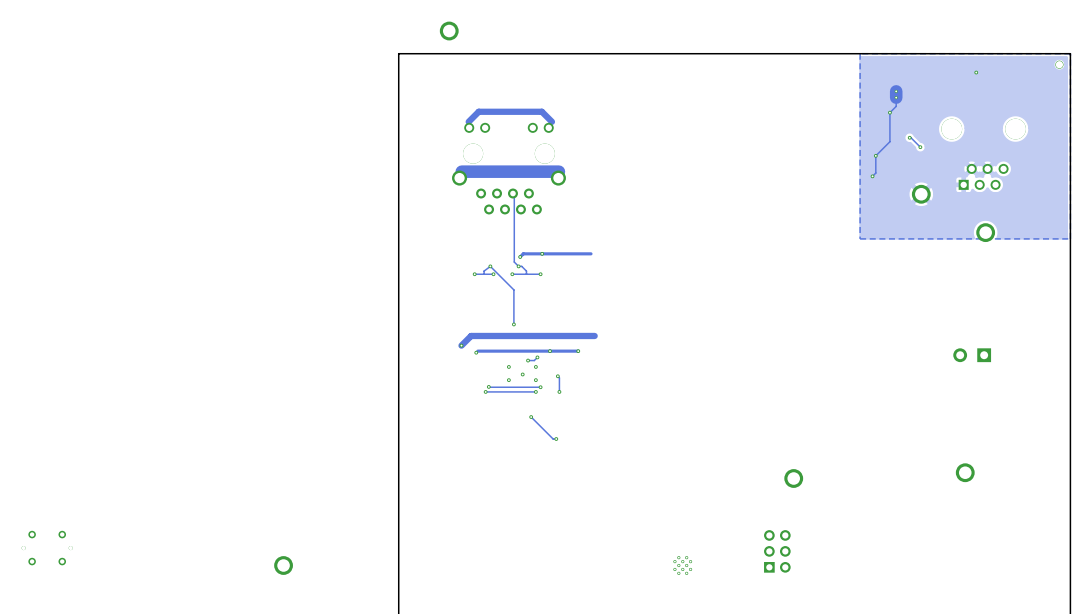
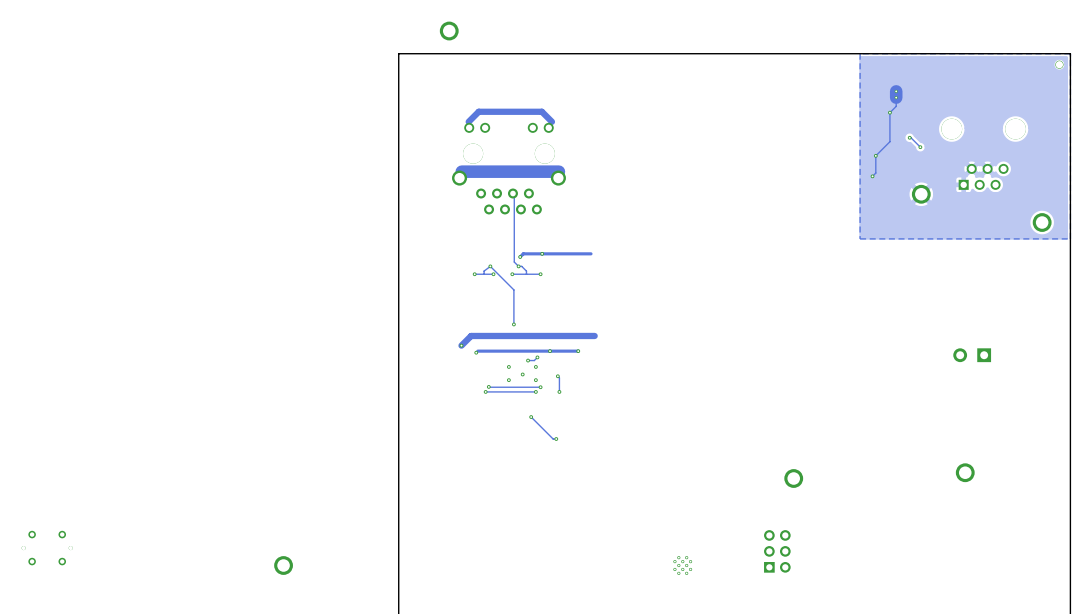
via: (976, 72) -> none
part position: (985, 232) -> (1042, 222)

